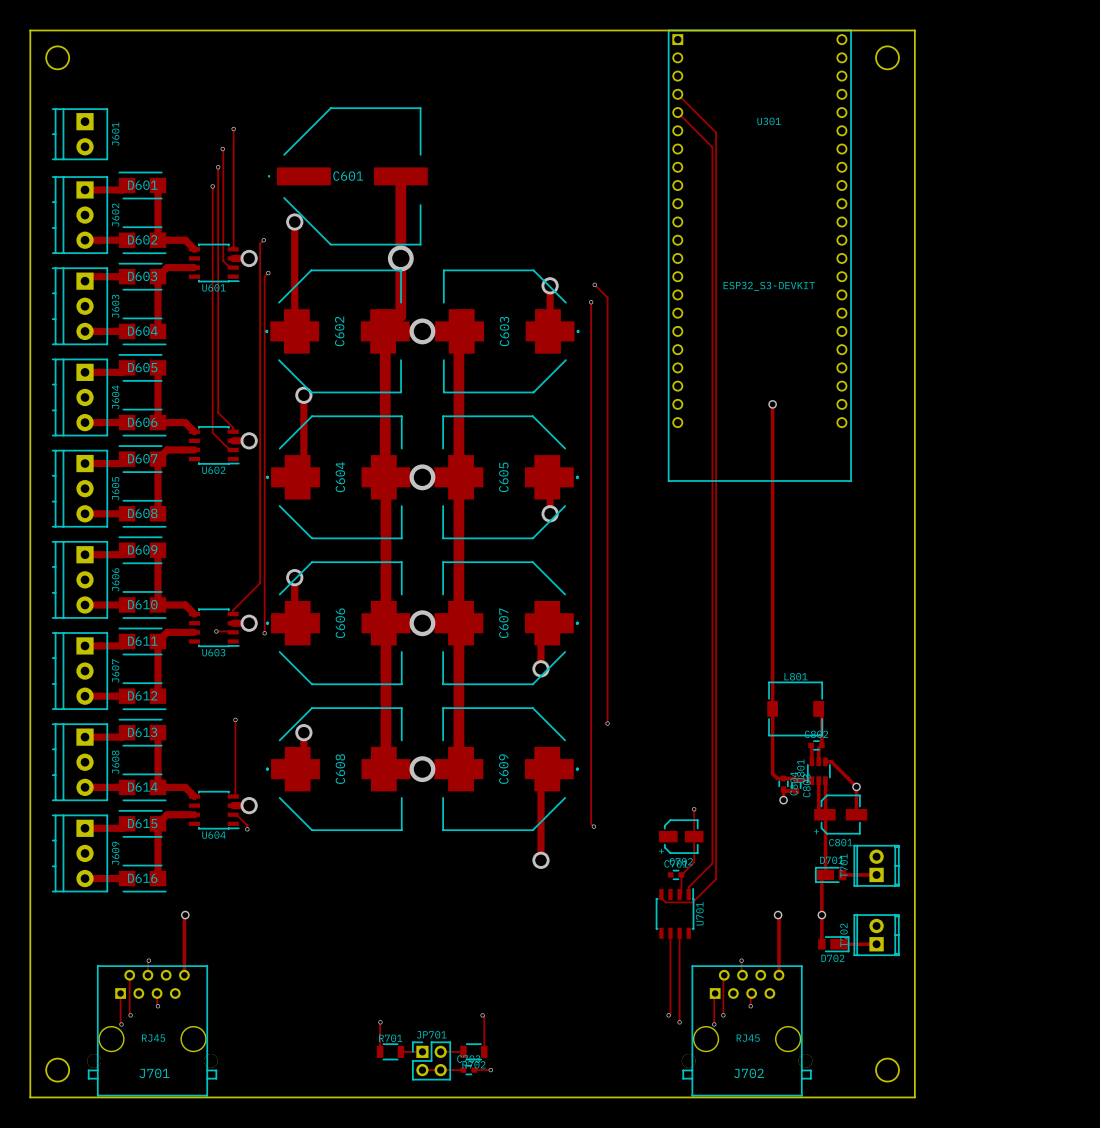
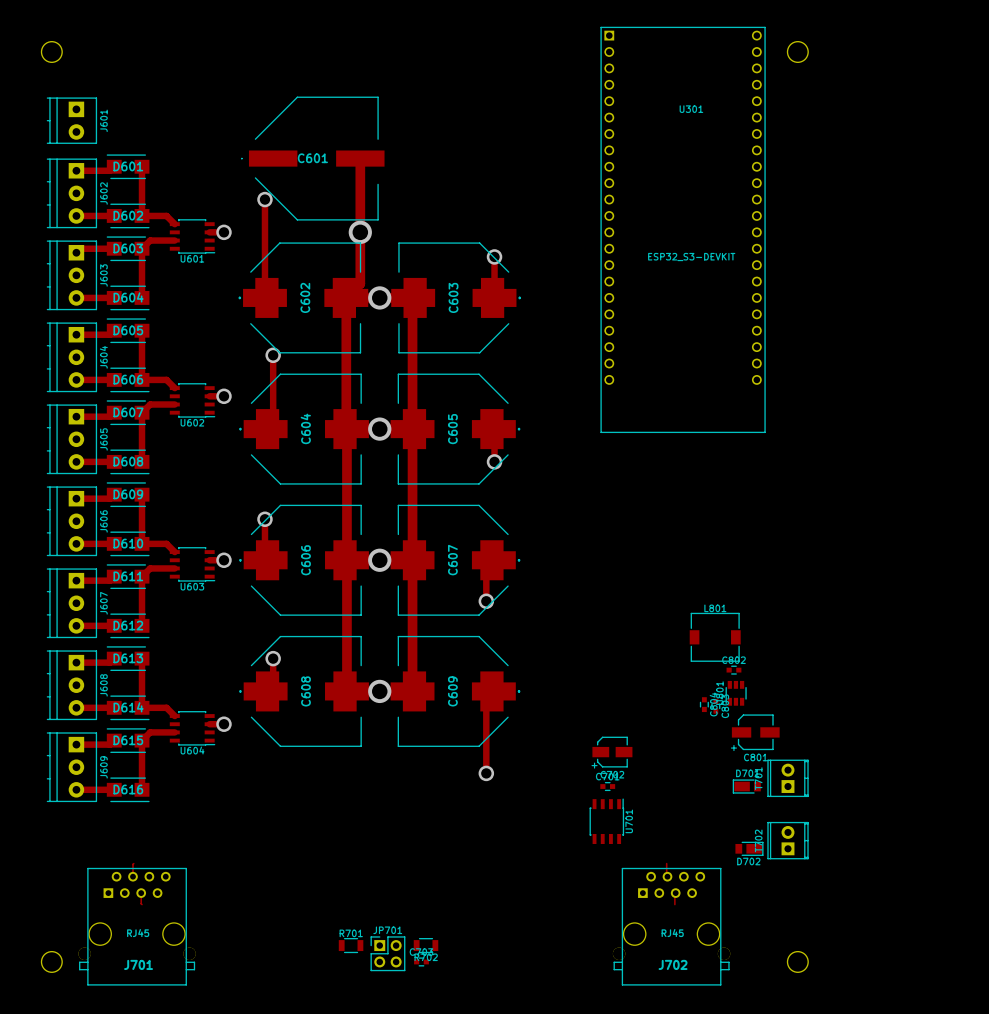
board edge: (30, 30) (30, 1097) (914, 1097) (914, 30) (30, 30) -> none
track: (677, 94) (716, 132) (716, 879) (692, 902) (665, 902) (661, 897) (661, 894) -> none
track: (677, 112) (712, 147) (712, 863) (688, 887) (688, 894) -> none
track: (233, 128) (233, 249) -> none
via: (233, 128) -> none
via: (222, 149) -> none
track: (223, 149) (223, 261) (229, 267) (233, 267) -> none
track: (218, 167) (218, 412) (233, 427) (233, 431) -> none
via: (218, 167) -> none
track: (212, 186) (212, 432) (229, 449) (233, 449) -> none
via: (212, 186) -> none
track: (263, 240) (260, 243) (260, 583) (233, 610) (233, 614) -> none
via: (263, 240) -> none
track: (268, 273) (264, 276) (264, 633) -> none
via: (268, 273) -> none
track: (594, 284) (607, 297) (607, 723) -> none
via: (594, 284) -> none
track: (591, 302) (591, 823) (593, 826) -> none
via: (591, 302) -> none
track: (772, 404) (772, 773) (777, 778) (811, 780) -> none
via: (772, 404) -> none
track: (216, 631) (233, 632) -> none
via: (216, 631) -> none
via: (264, 633) -> none
track: (818, 708) (821, 712) (821, 745) (818, 748) (818, 761) -> none
track: (235, 719) (235, 794) (233, 796) -> none
via: (235, 719) -> none
via: (607, 723) -> none
track: (811, 745) (811, 761) -> none
track: (825, 761) (831, 761) (856, 786) (856, 814) -> none
track: (818, 780) (818, 808) (825, 815) (825, 874) (821, 878) (821, 944) -> none
track: (825, 780) (824, 814) -> none
via: (856, 786) -> none
track: (796, 791) (785, 791) (783, 789) (783, 800) -> none
via: (783, 800) -> none
track: (694, 809) (694, 862) (681, 874) (681, 892) (679, 894) -> none
via: (694, 809) -> none
track: (233, 814) (236, 814) (247, 825) (247, 829) -> none
via: (593, 826) -> none
via: (247, 829) -> none
track: (842, 874) (876, 874) -> none
track: (184, 915) (184, 975) -> none
via: (185, 915) -> none
via: (778, 915) -> none
track: (779, 915) (779, 975) -> none
via: (821, 915) -> none
track: (670, 933) (670, 1013) (668, 1015) -> none
track: (679, 933) (679, 1022) -> none
track: (838, 944) (876, 944) -> none
via: (148, 960) -> none
via: (741, 960) -> none
track: (129, 975) (130, 1015) -> none
track: (724, 975) (723, 1015) -> none
track: (120, 993) (121, 1024) -> none
track: (715, 993) (714, 1024) -> none
via: (157, 1006) -> none
via: (750, 1006) -> none
via: (130, 1015) -> none
track: (482, 1015) (484, 1017) (484, 1051) -> none
via: (482, 1015) -> none
via: (668, 1015) -> none
via: (723, 1015) -> none
track: (380, 1022) (380, 1051) -> none
via: (380, 1022) -> none
via: (679, 1022) -> none
via: (121, 1024) -> none
via: (714, 1024) -> none
track: (400, 1051) (422, 1051) -> none
track: (440, 1051) (463, 1051) -> none
track: (422, 1070) (463, 1070) -> none
track: (474, 1070) (490, 1070) -> none
via: (490, 1070) -> none

